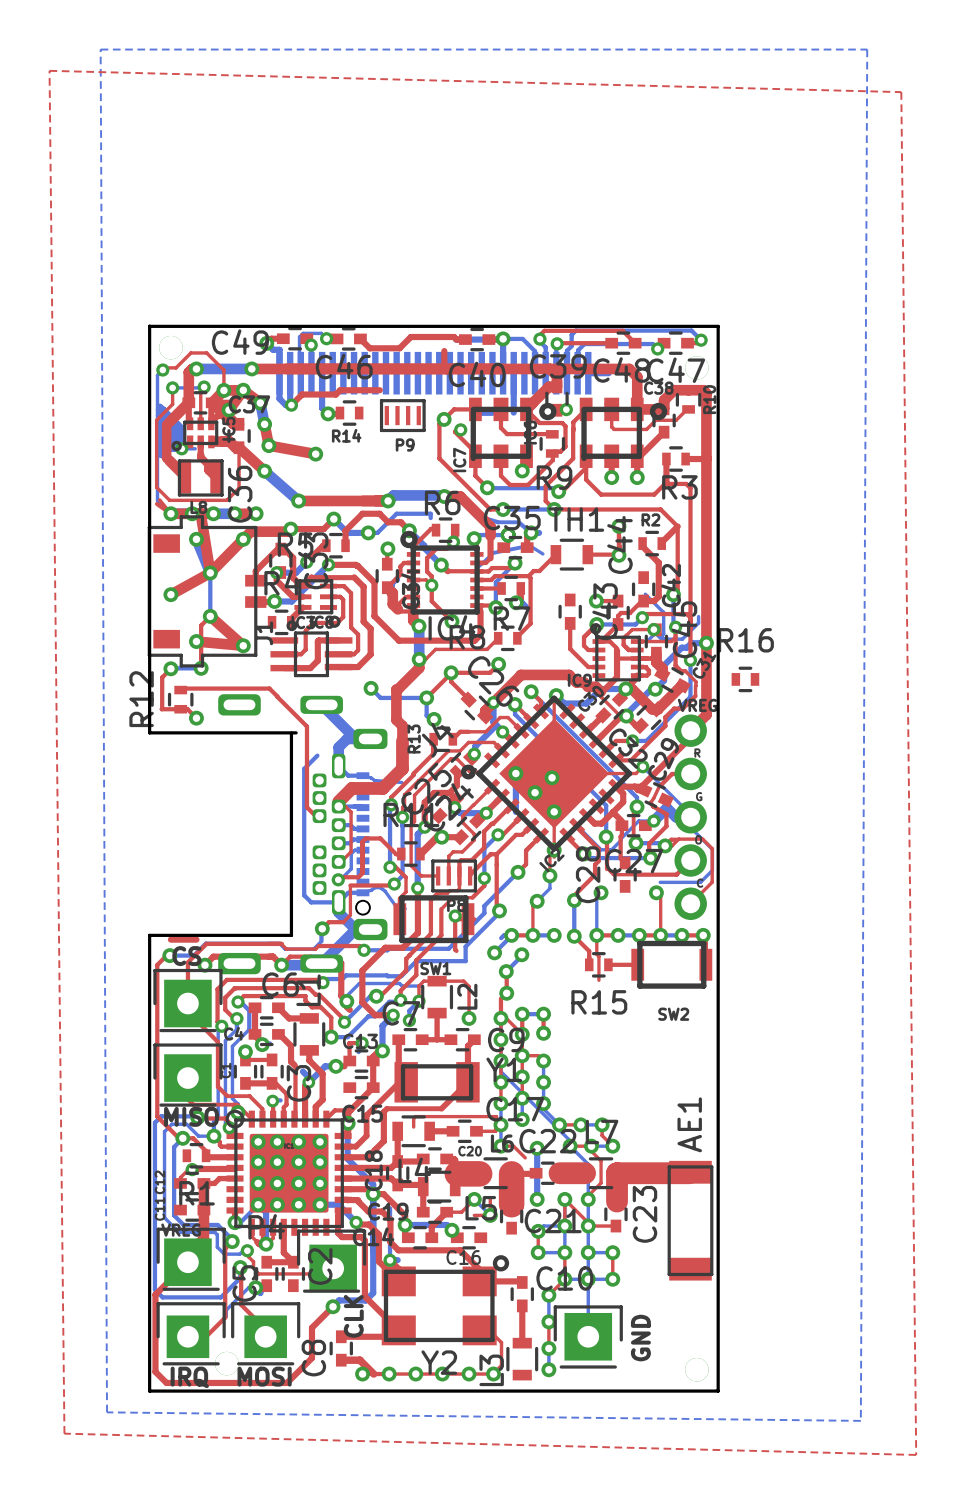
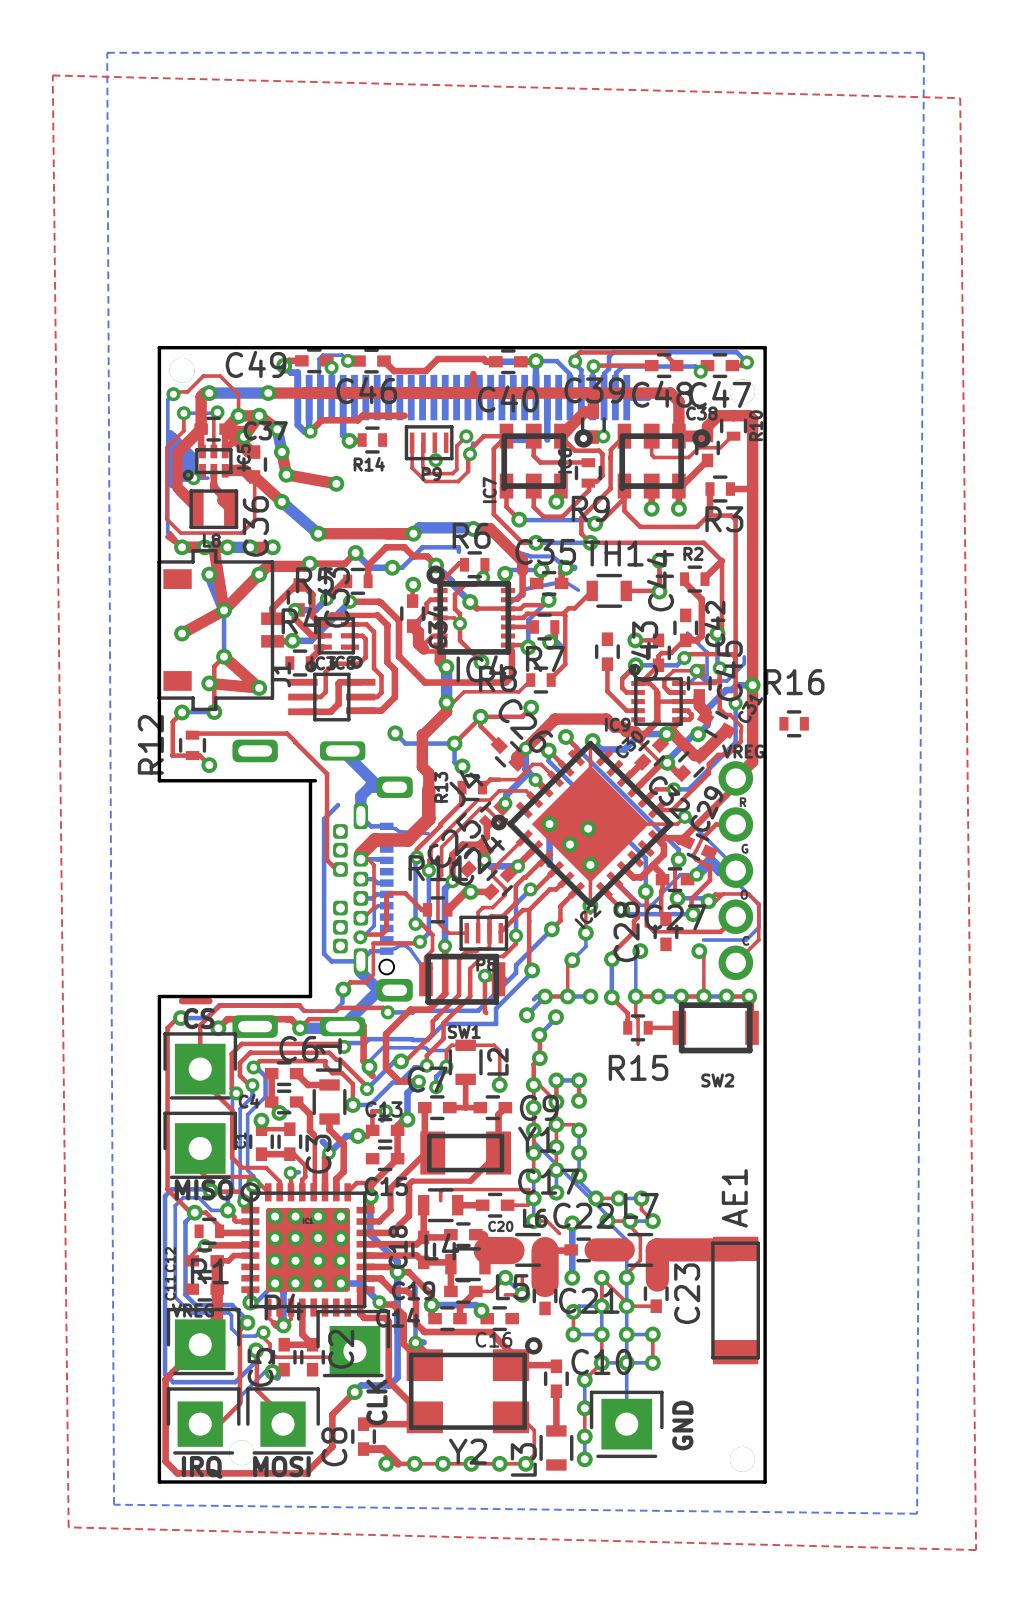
top track: none -> (466, 436) (456, 445) (456, 469) (452, 473) (429, 473) (422, 466) (423, 442)
via: none -> (466, 436)
top track: none -> (412, 442) (412, 467) (425, 481) (458, 481) (468, 471)
via: (444, 419) -> none
via: none -> (469, 454)
top track: (460, 429) (454, 431) (475, 452) -> none
via: (460, 429) -> none
via: none -> (435, 460)
top track: (439, 442) (439, 458) (463, 482) -> (506, 436) (493, 448) (493, 514)

